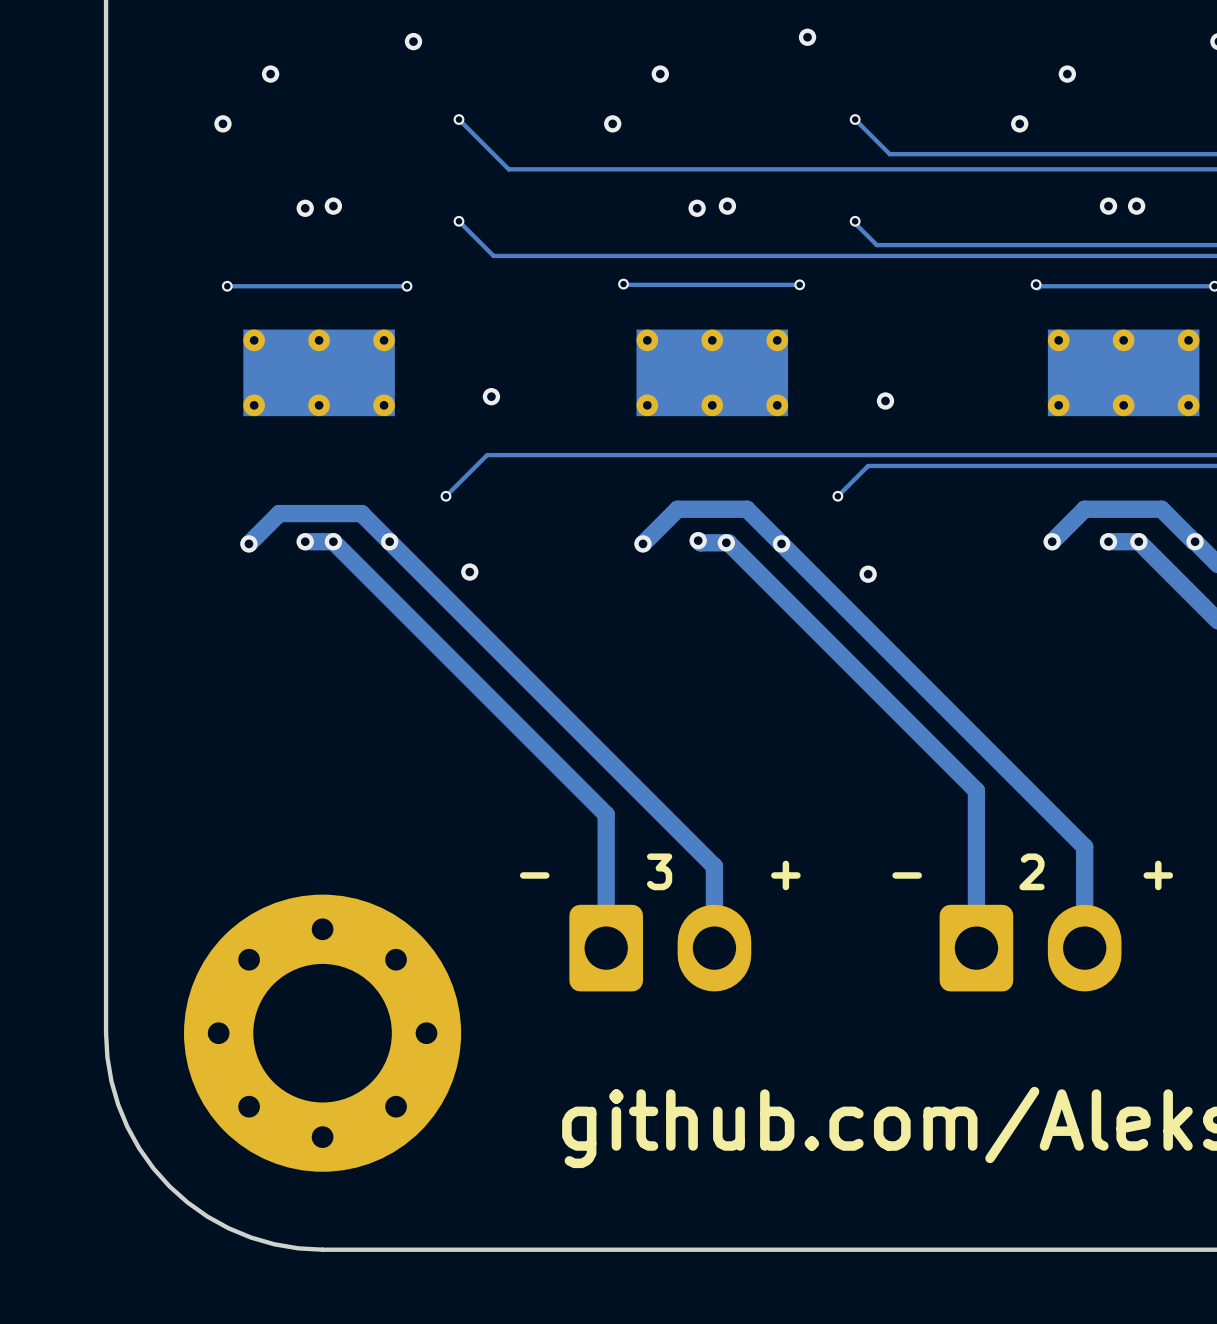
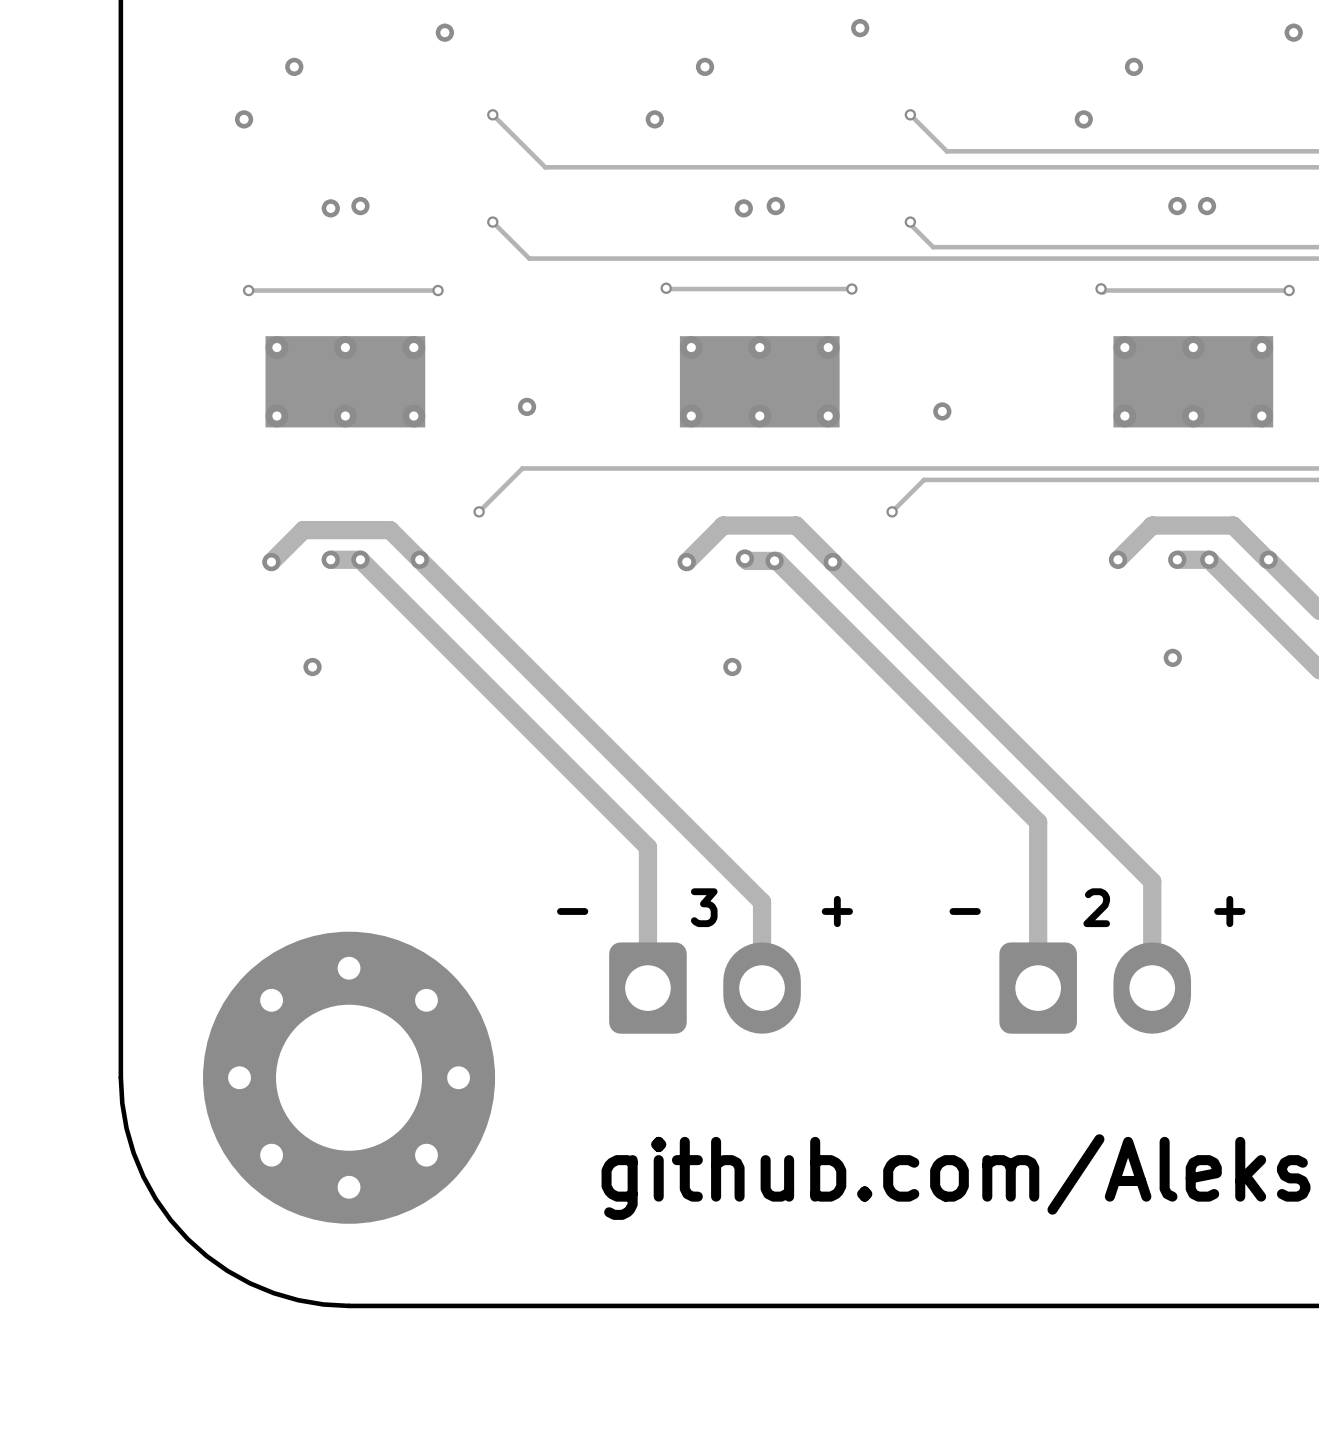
via: (469, 572) -> none
via: (868, 574) -> none
via: none -> (1172, 657)
via: none -> (312, 667)
via: none -> (732, 667)

